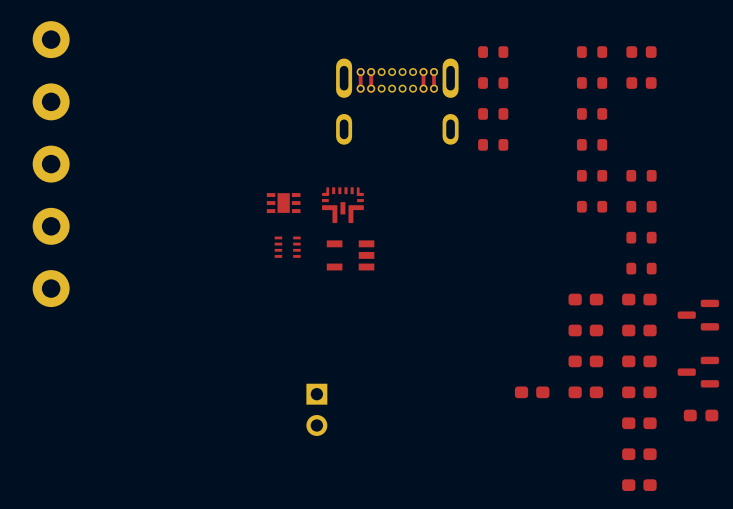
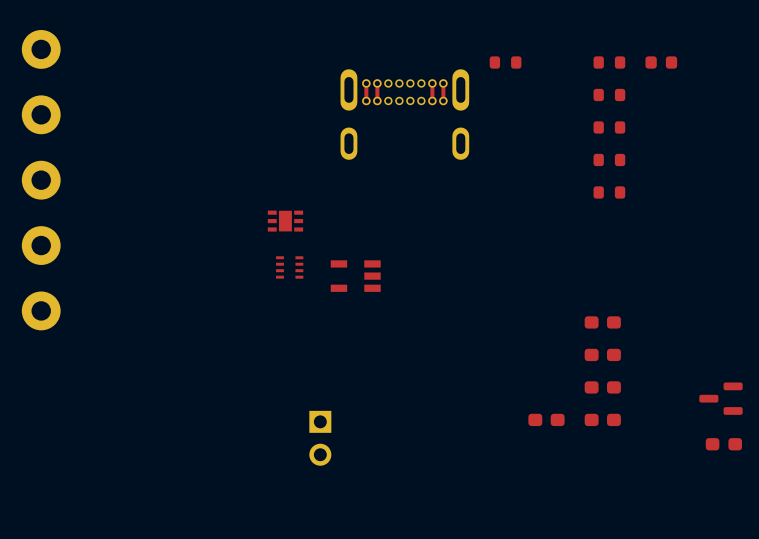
part: (493, 83) -> none
part: (641, 83) -> none
part: (493, 113) -> none
part: (493, 144) -> none
part: (641, 175) -> none
part: (342, 205) -> none
part: (592, 206) -> none
part: (641, 206) -> none
part: (641, 237) -> none
part: (641, 268) -> none
part: (639, 299) -> none
part: (698, 315) -> none
part: (639, 330) -> none
part: (639, 361) -> none
part: (639, 392) -> none
part: (639, 423) -> none
part: (639, 454) -> none
part: (639, 485) -> none

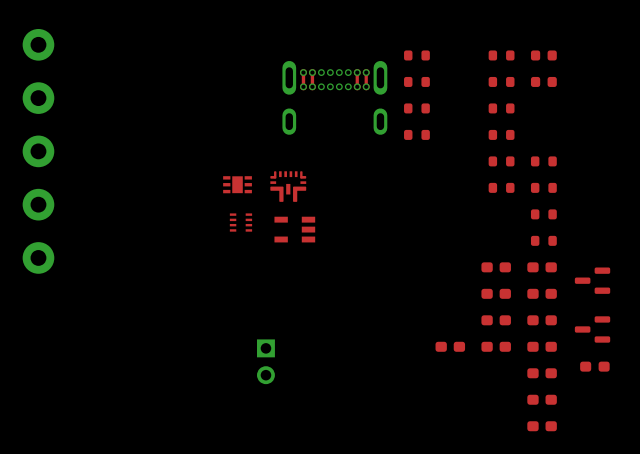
part: none -> (416, 81)
part: none -> (543, 81)
part: none -> (416, 108)
part: none -> (416, 134)
part: none -> (543, 161)
part: none -> (288, 186)
part: none -> (501, 187)
part: none -> (543, 187)
part: none -> (543, 214)
part: none -> (543, 240)
part: none -> (542, 267)
part: none -> (592, 280)
part: none -> (542, 293)
part: none -> (542, 320)
part: none -> (542, 346)
part: none -> (542, 373)
part: none -> (542, 399)
part: none -> (542, 426)

